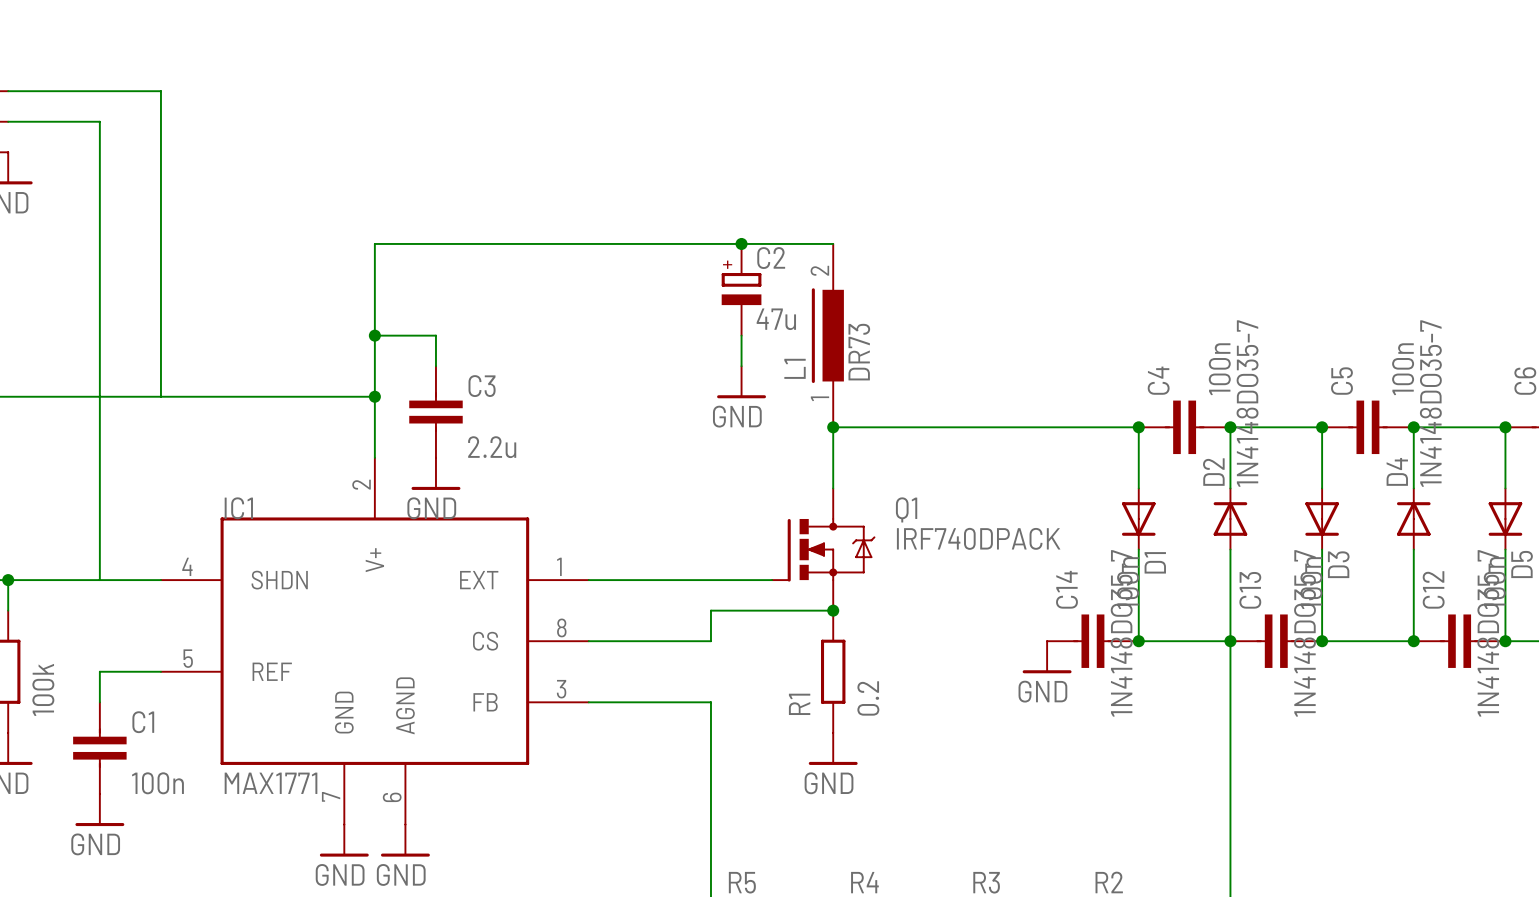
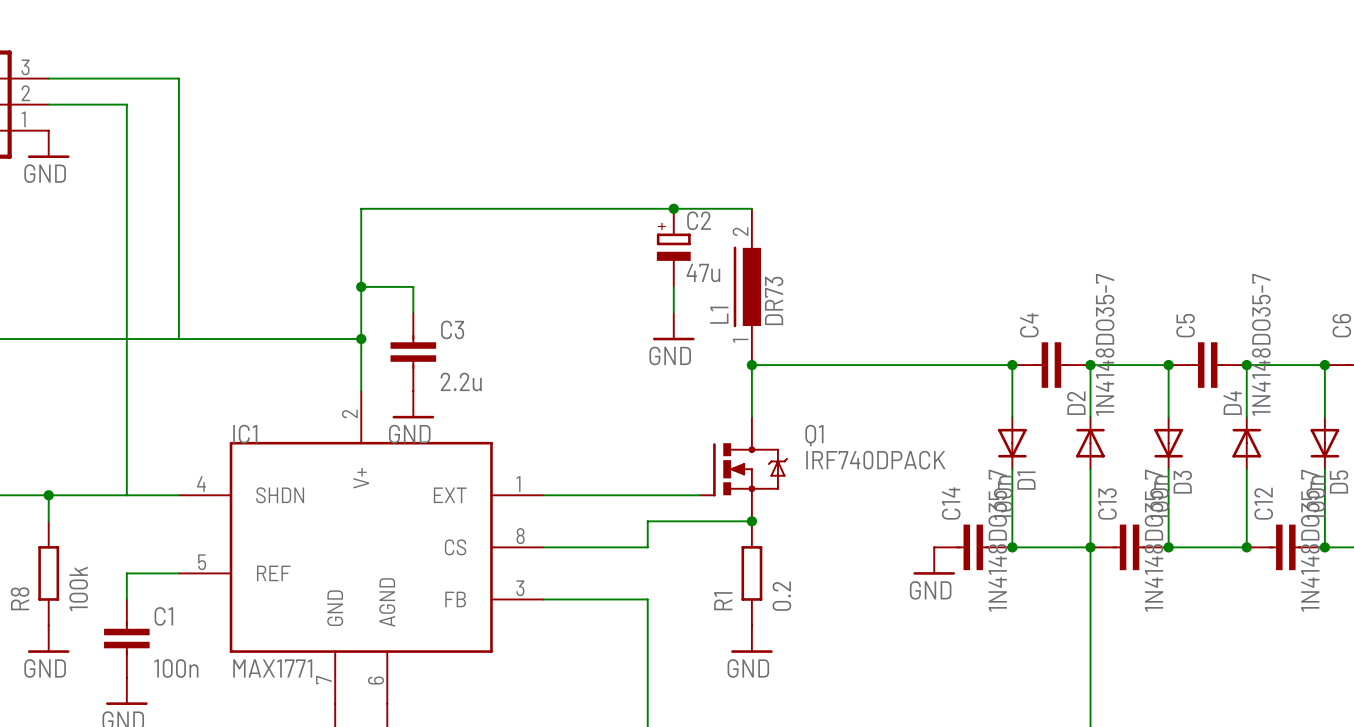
C4 value: 100n (1219, 369) -> none
C5 value: 100n (1403, 369) -> none

